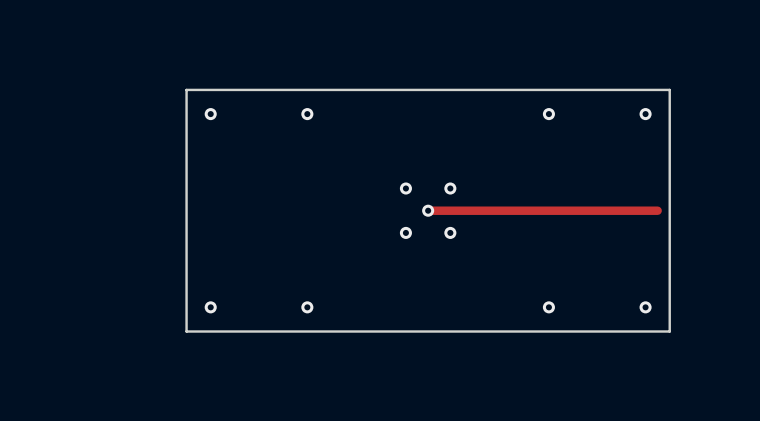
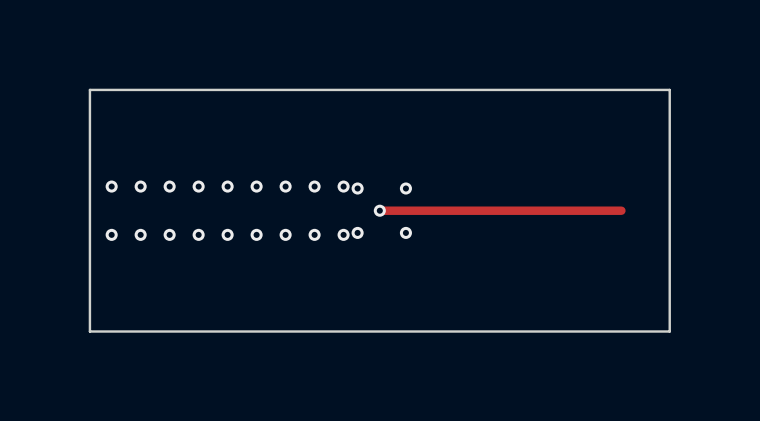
board edge: (186, 89) (186, 331) -> (186, 89) (89, 89) (89, 331) (186, 331)
via: (210, 114) -> none
via: (307, 114) -> none
via: (548, 114) -> none
via: (645, 114) -> none
via: none -> (111, 186)
via: none -> (140, 186)
via: none -> (169, 186)
via: none -> (198, 186)
via: none -> (227, 186)
via: none -> (256, 186)
via: none -> (285, 186)
via: none -> (314, 186)
via: none -> (343, 186)
via: none -> (357, 188)
via: (450, 188) -> none
top track: none -> (428, 210) (379, 210)
via position: (428, 210) -> (379, 210)
top track: (657, 210) (621, 210) -> none
via: none -> (357, 232)
via: (450, 232) -> none
via: none -> (111, 234)
via: none -> (140, 234)
via: none -> (169, 234)
via: none -> (198, 234)
via: none -> (227, 234)
via: none -> (256, 234)
via: none -> (285, 234)
via: none -> (314, 234)
via: none -> (343, 234)
via: (210, 307) -> none
via: (307, 307) -> none
via: (548, 307) -> none
via: (645, 307) -> none

